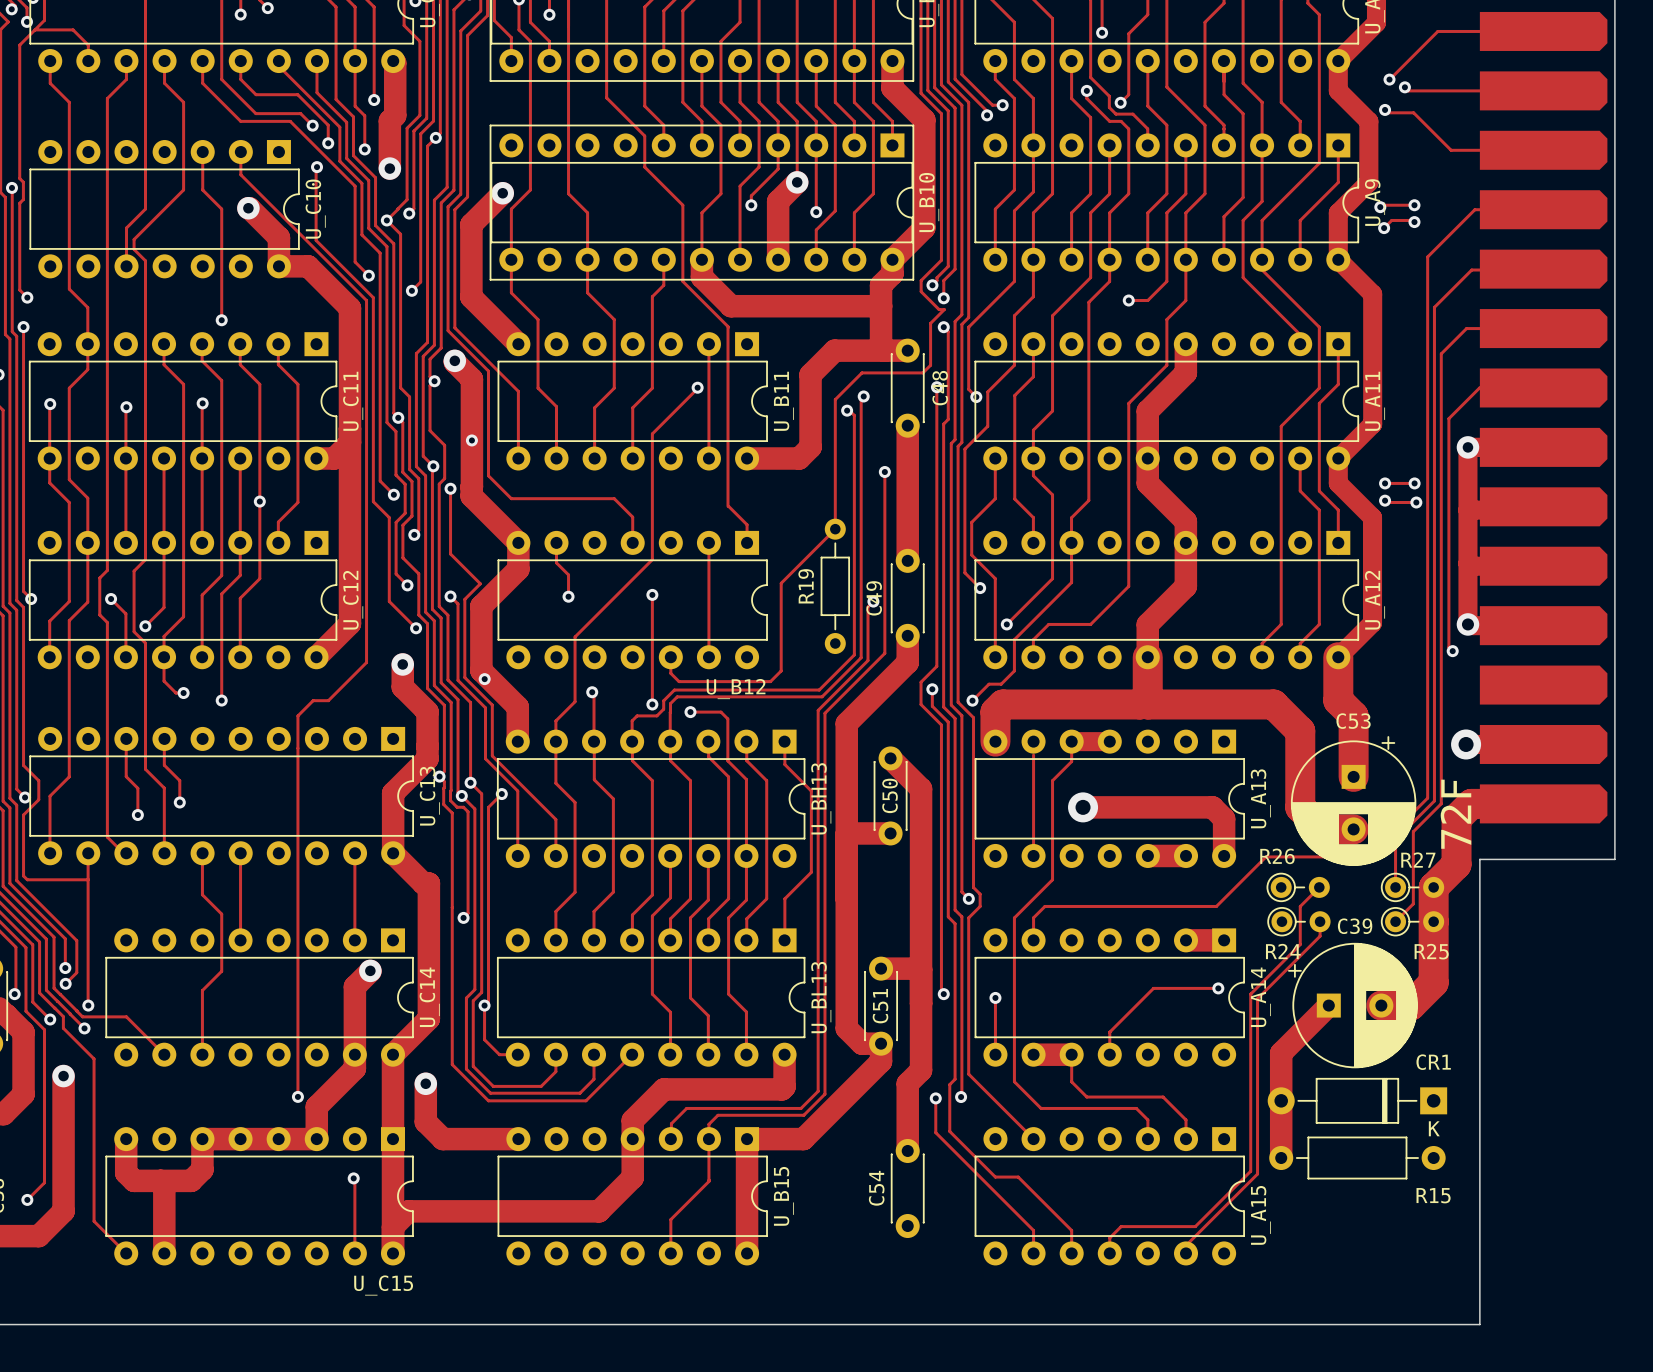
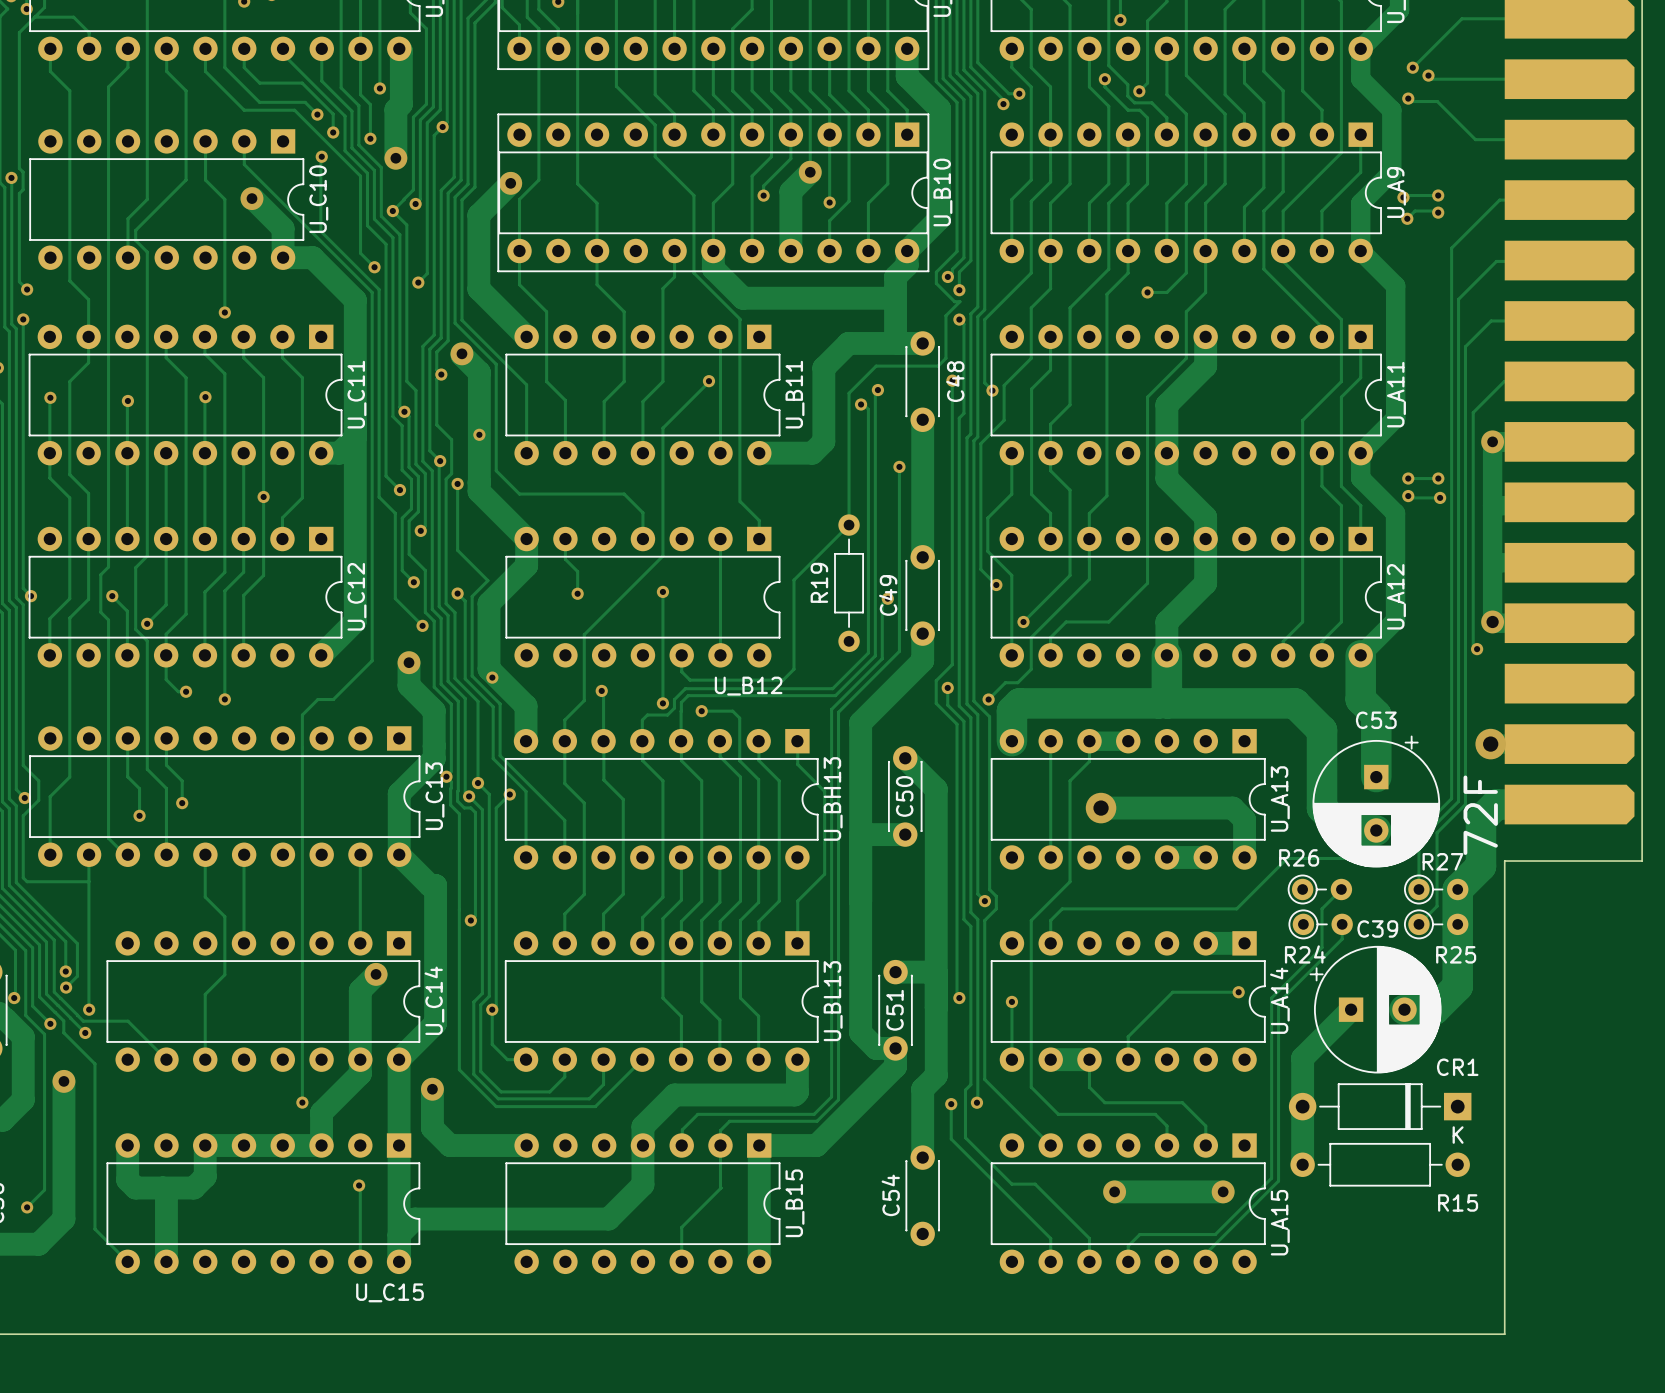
track: none -> (1114, 1191) (1223, 1191)
via: none -> (1114, 1191)
via: none -> (1223, 1191)

